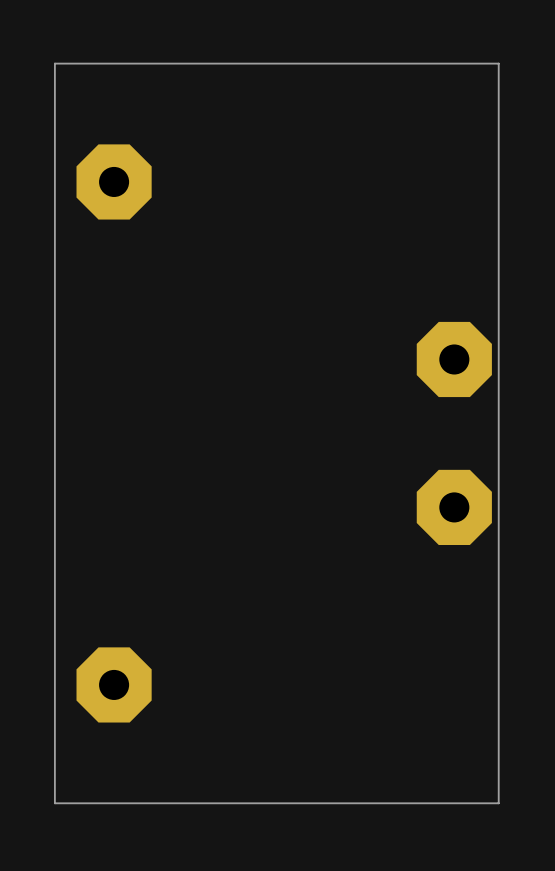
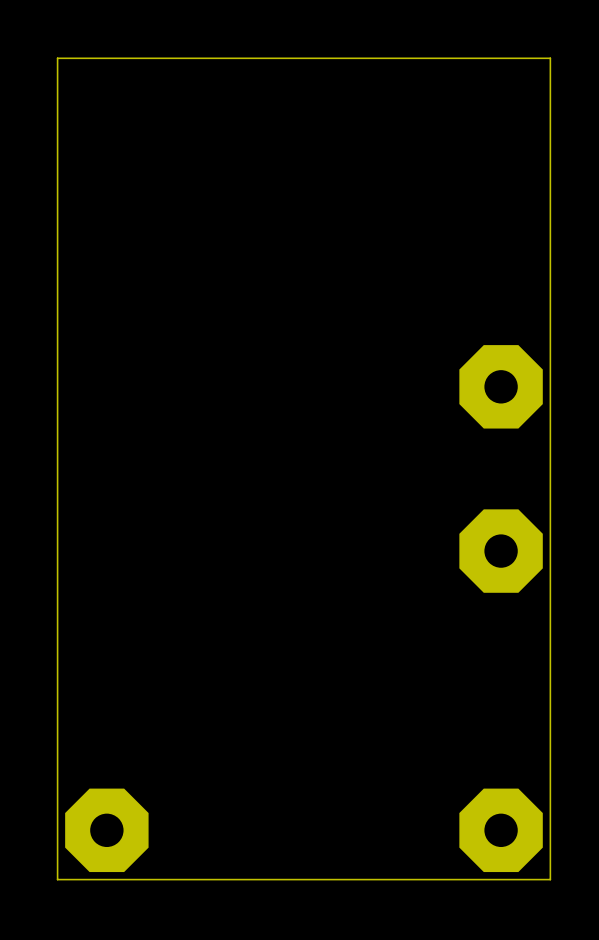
part: (114, 181) -> none
part position: (114, 684) -> (106, 830)
part: none -> (501, 830)

